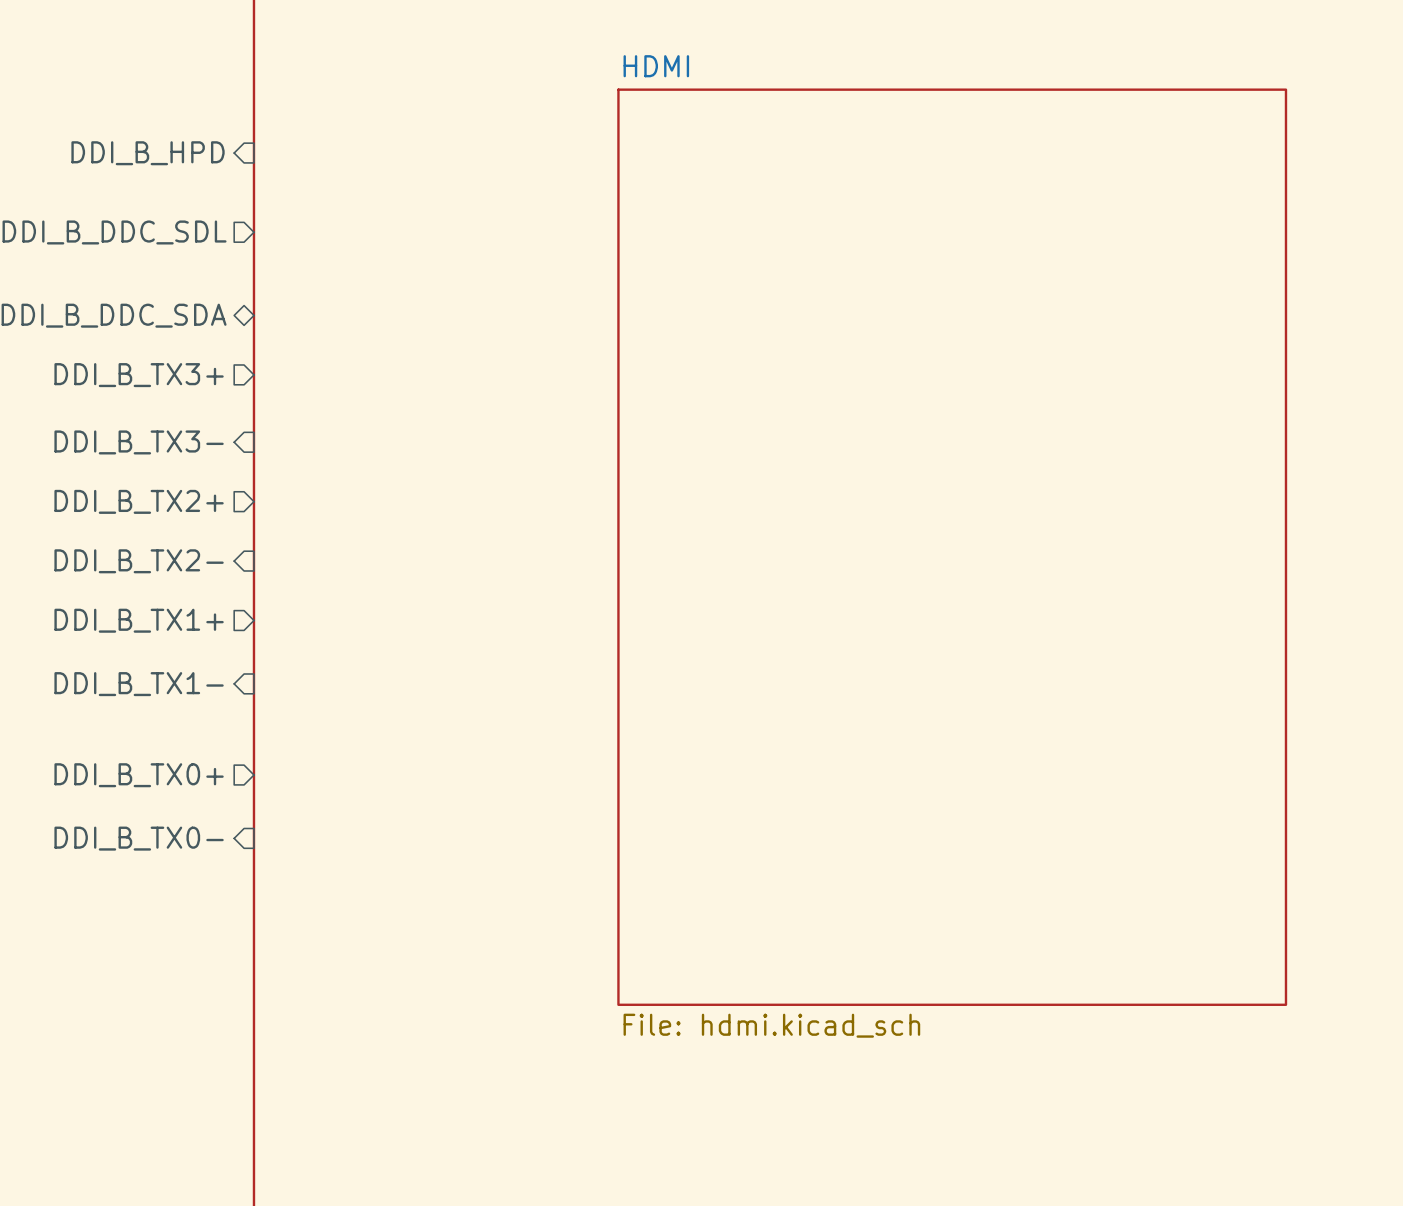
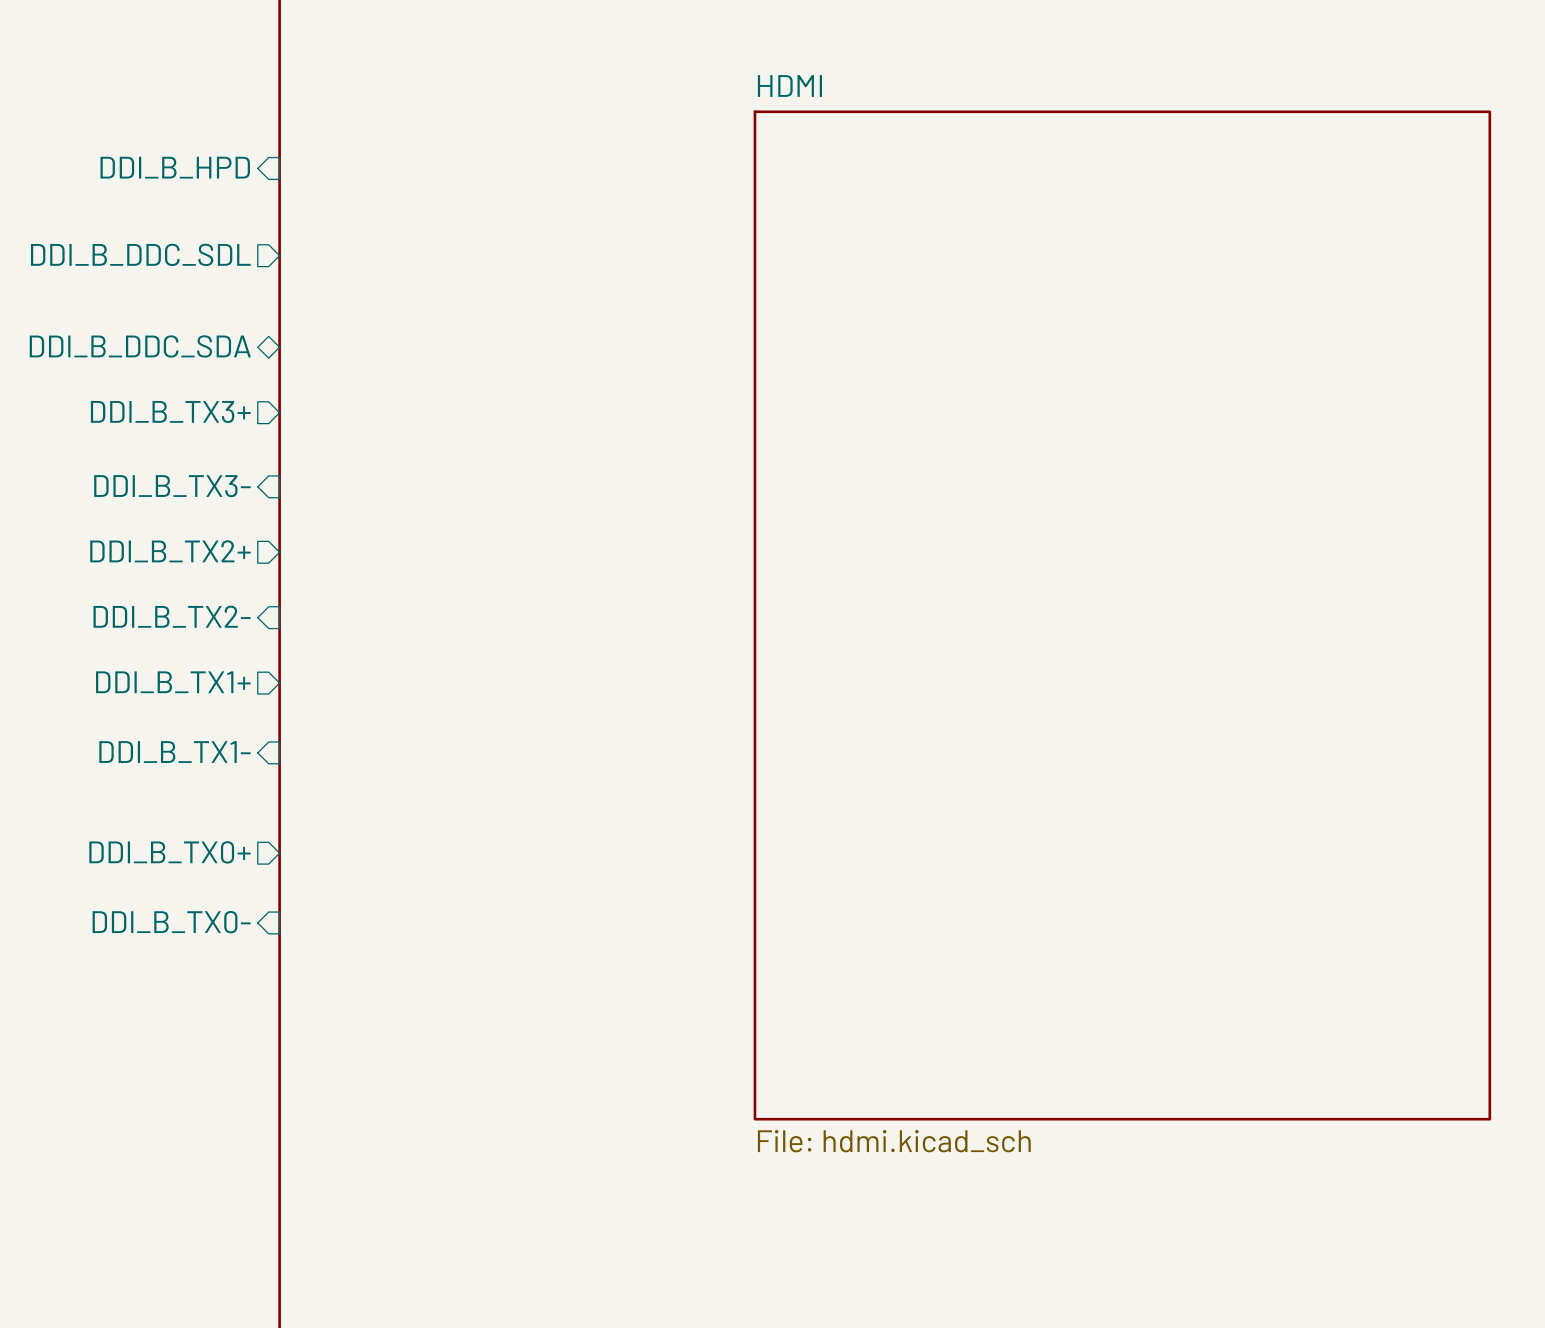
sheet HDMI position: (952, 547) -> (1122, 615)

